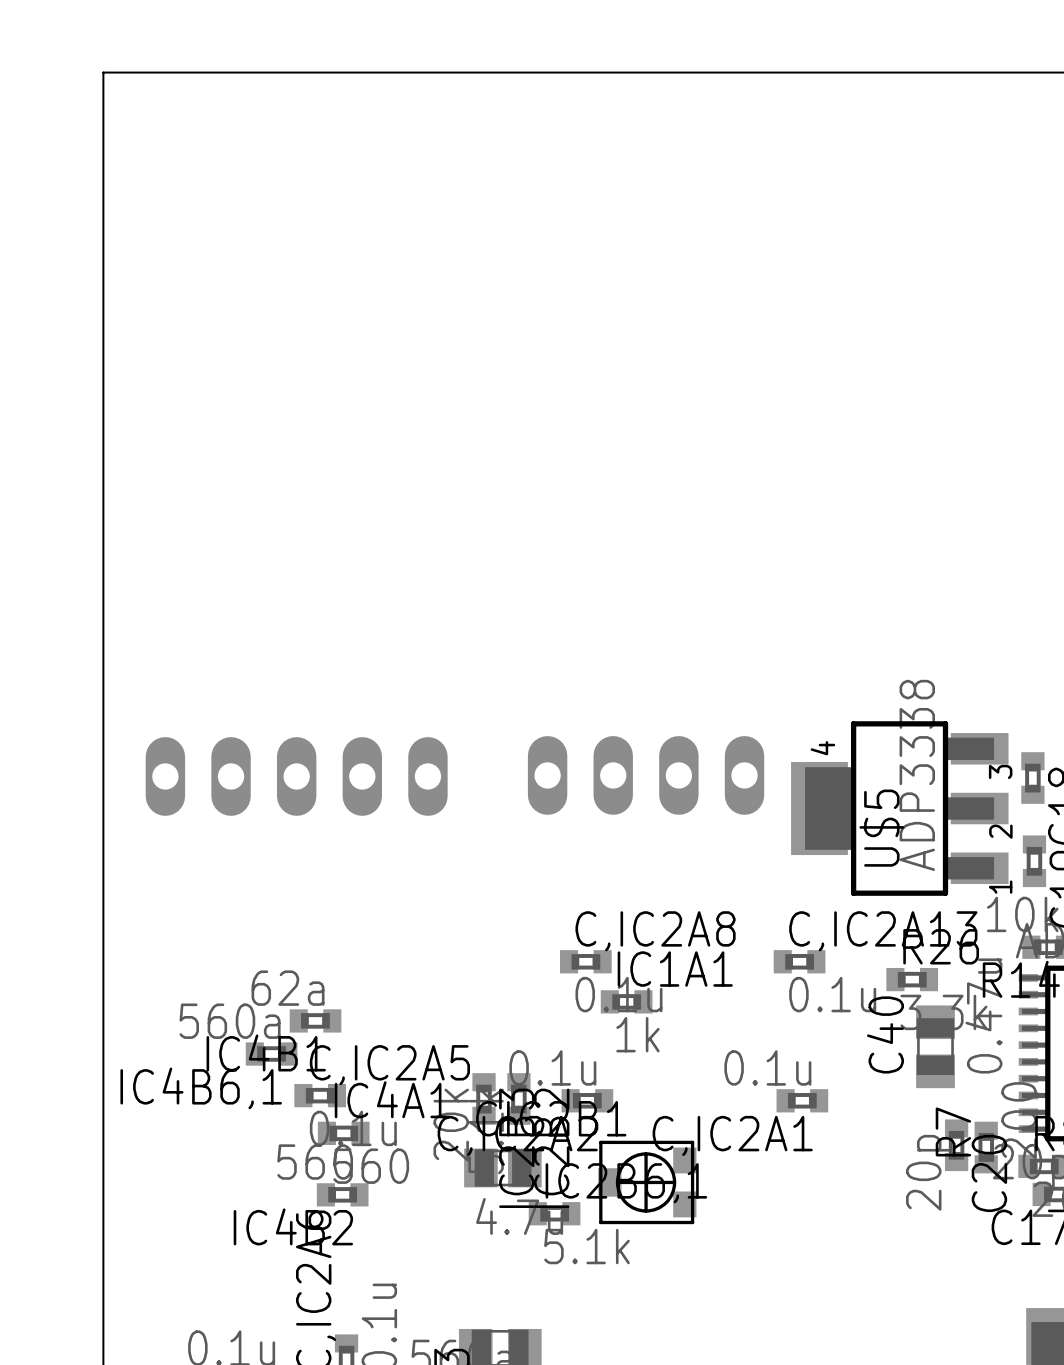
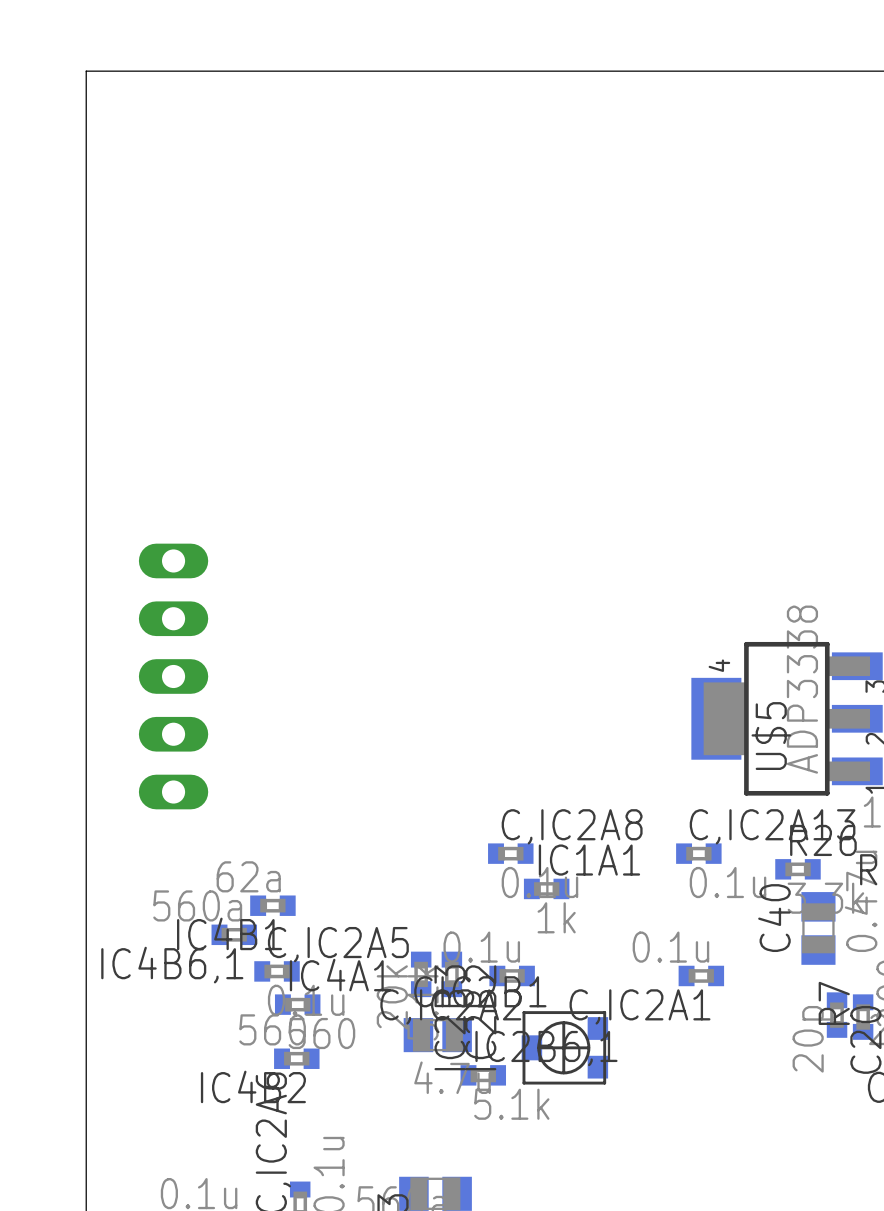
part: (646, 775) -> none
part rotation: 0° (296, 776) -> 90° clockwise (173, 676)

